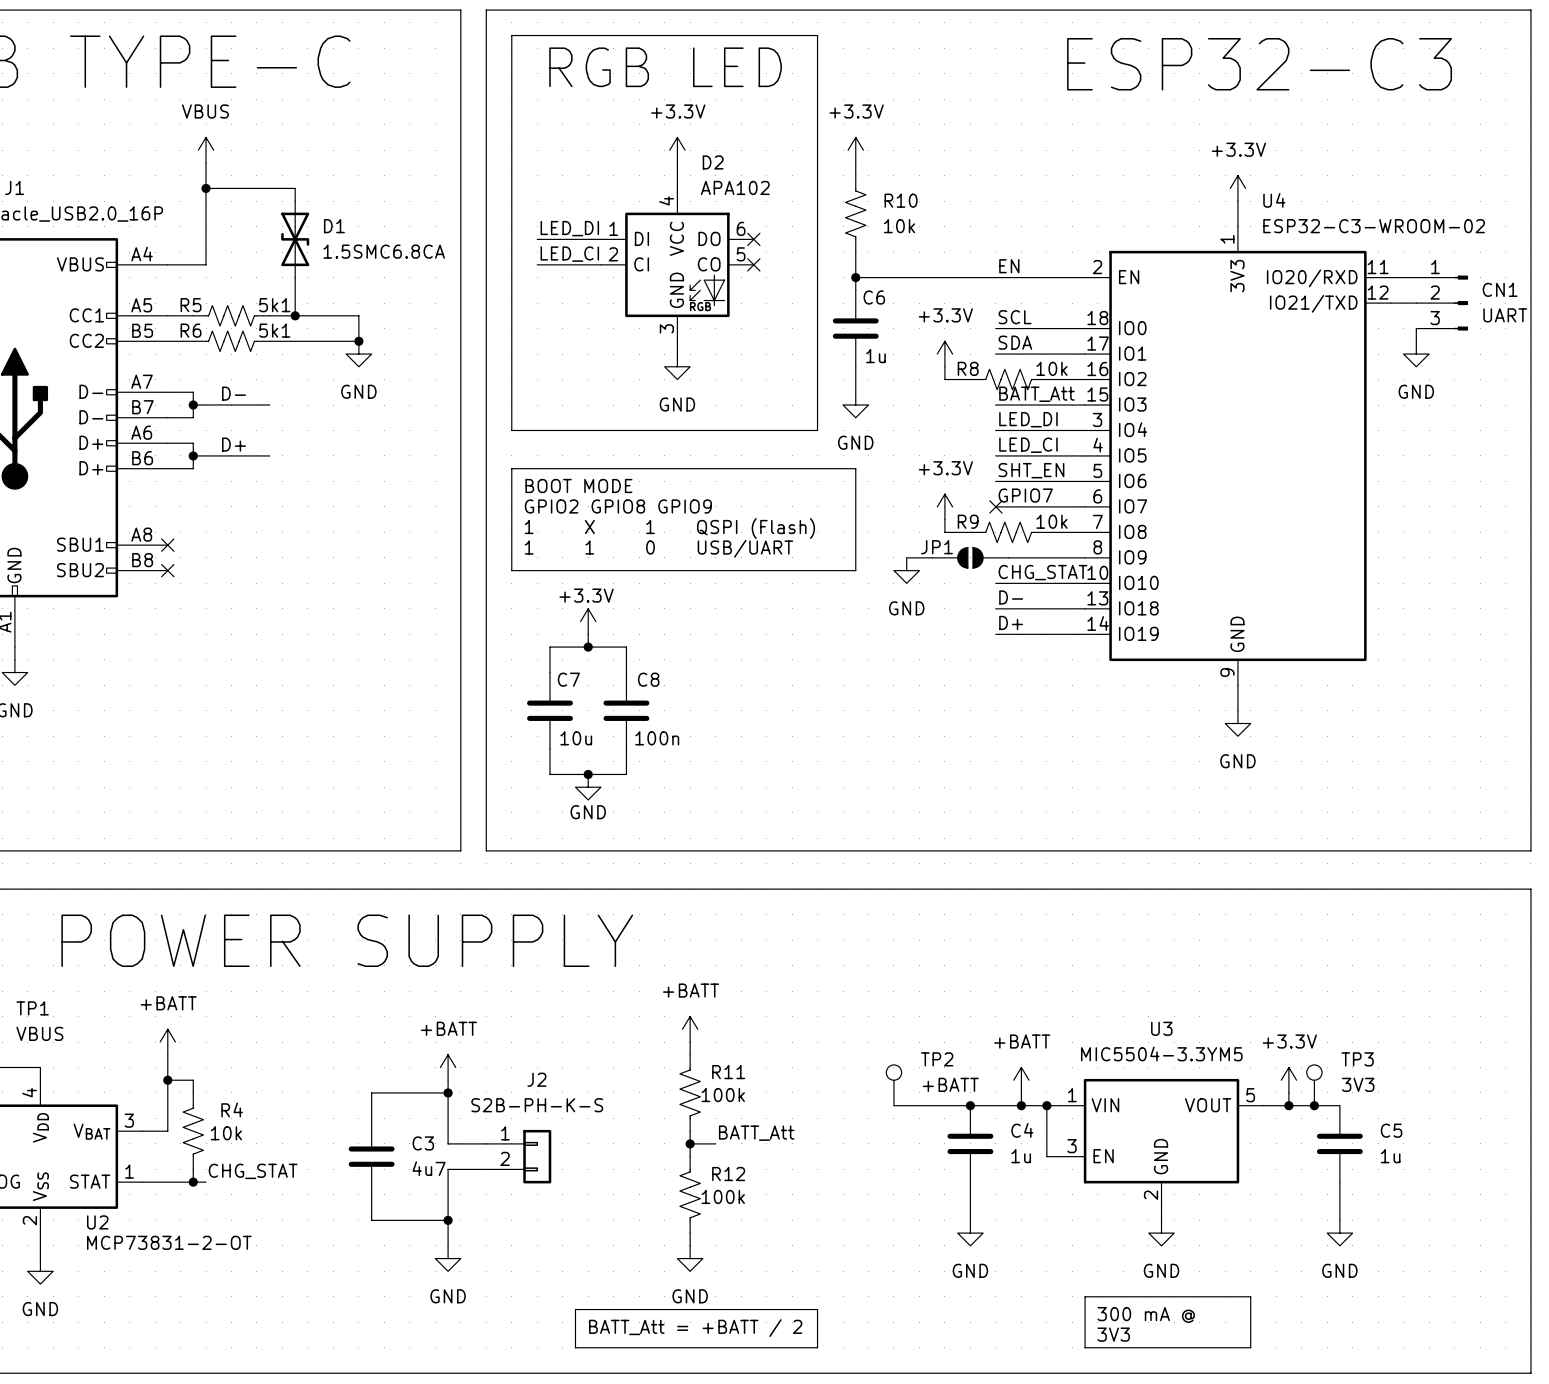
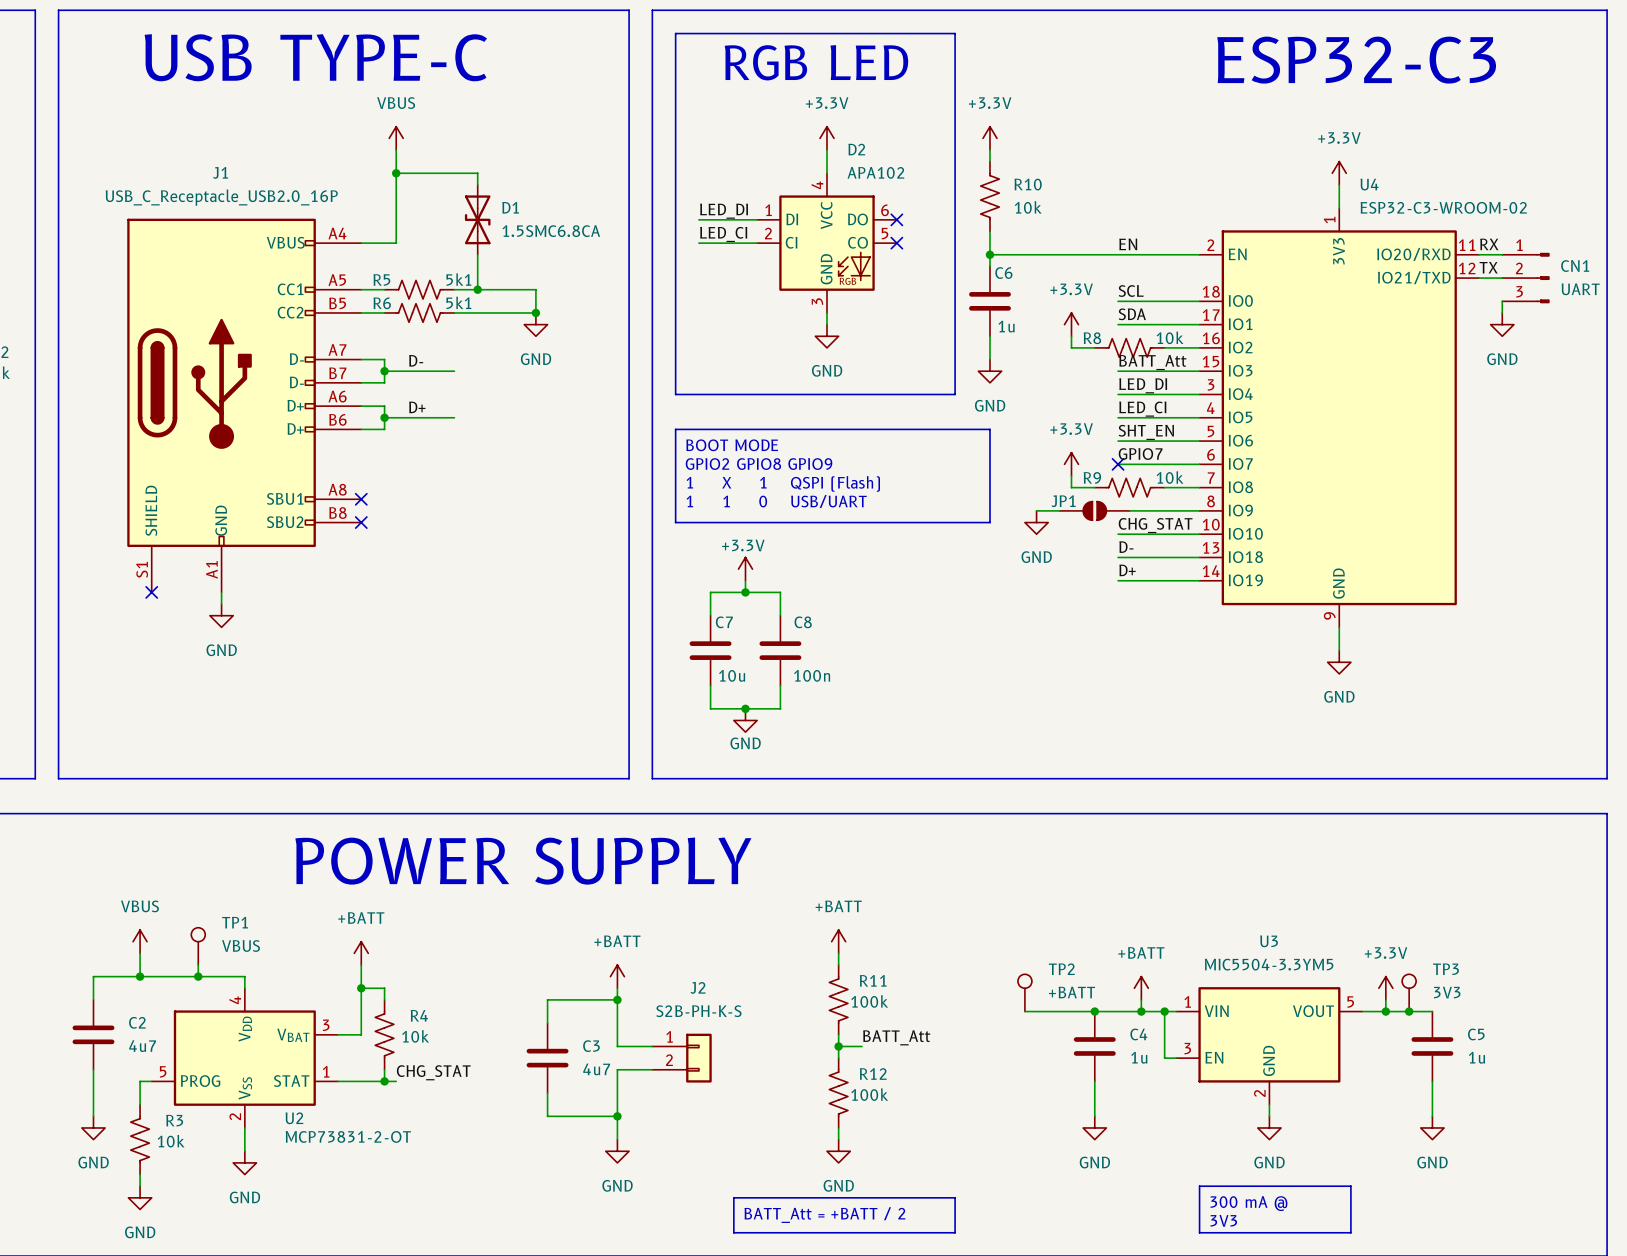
label: none -> RX (1489, 244)
label: none -> TX (1488, 267)

